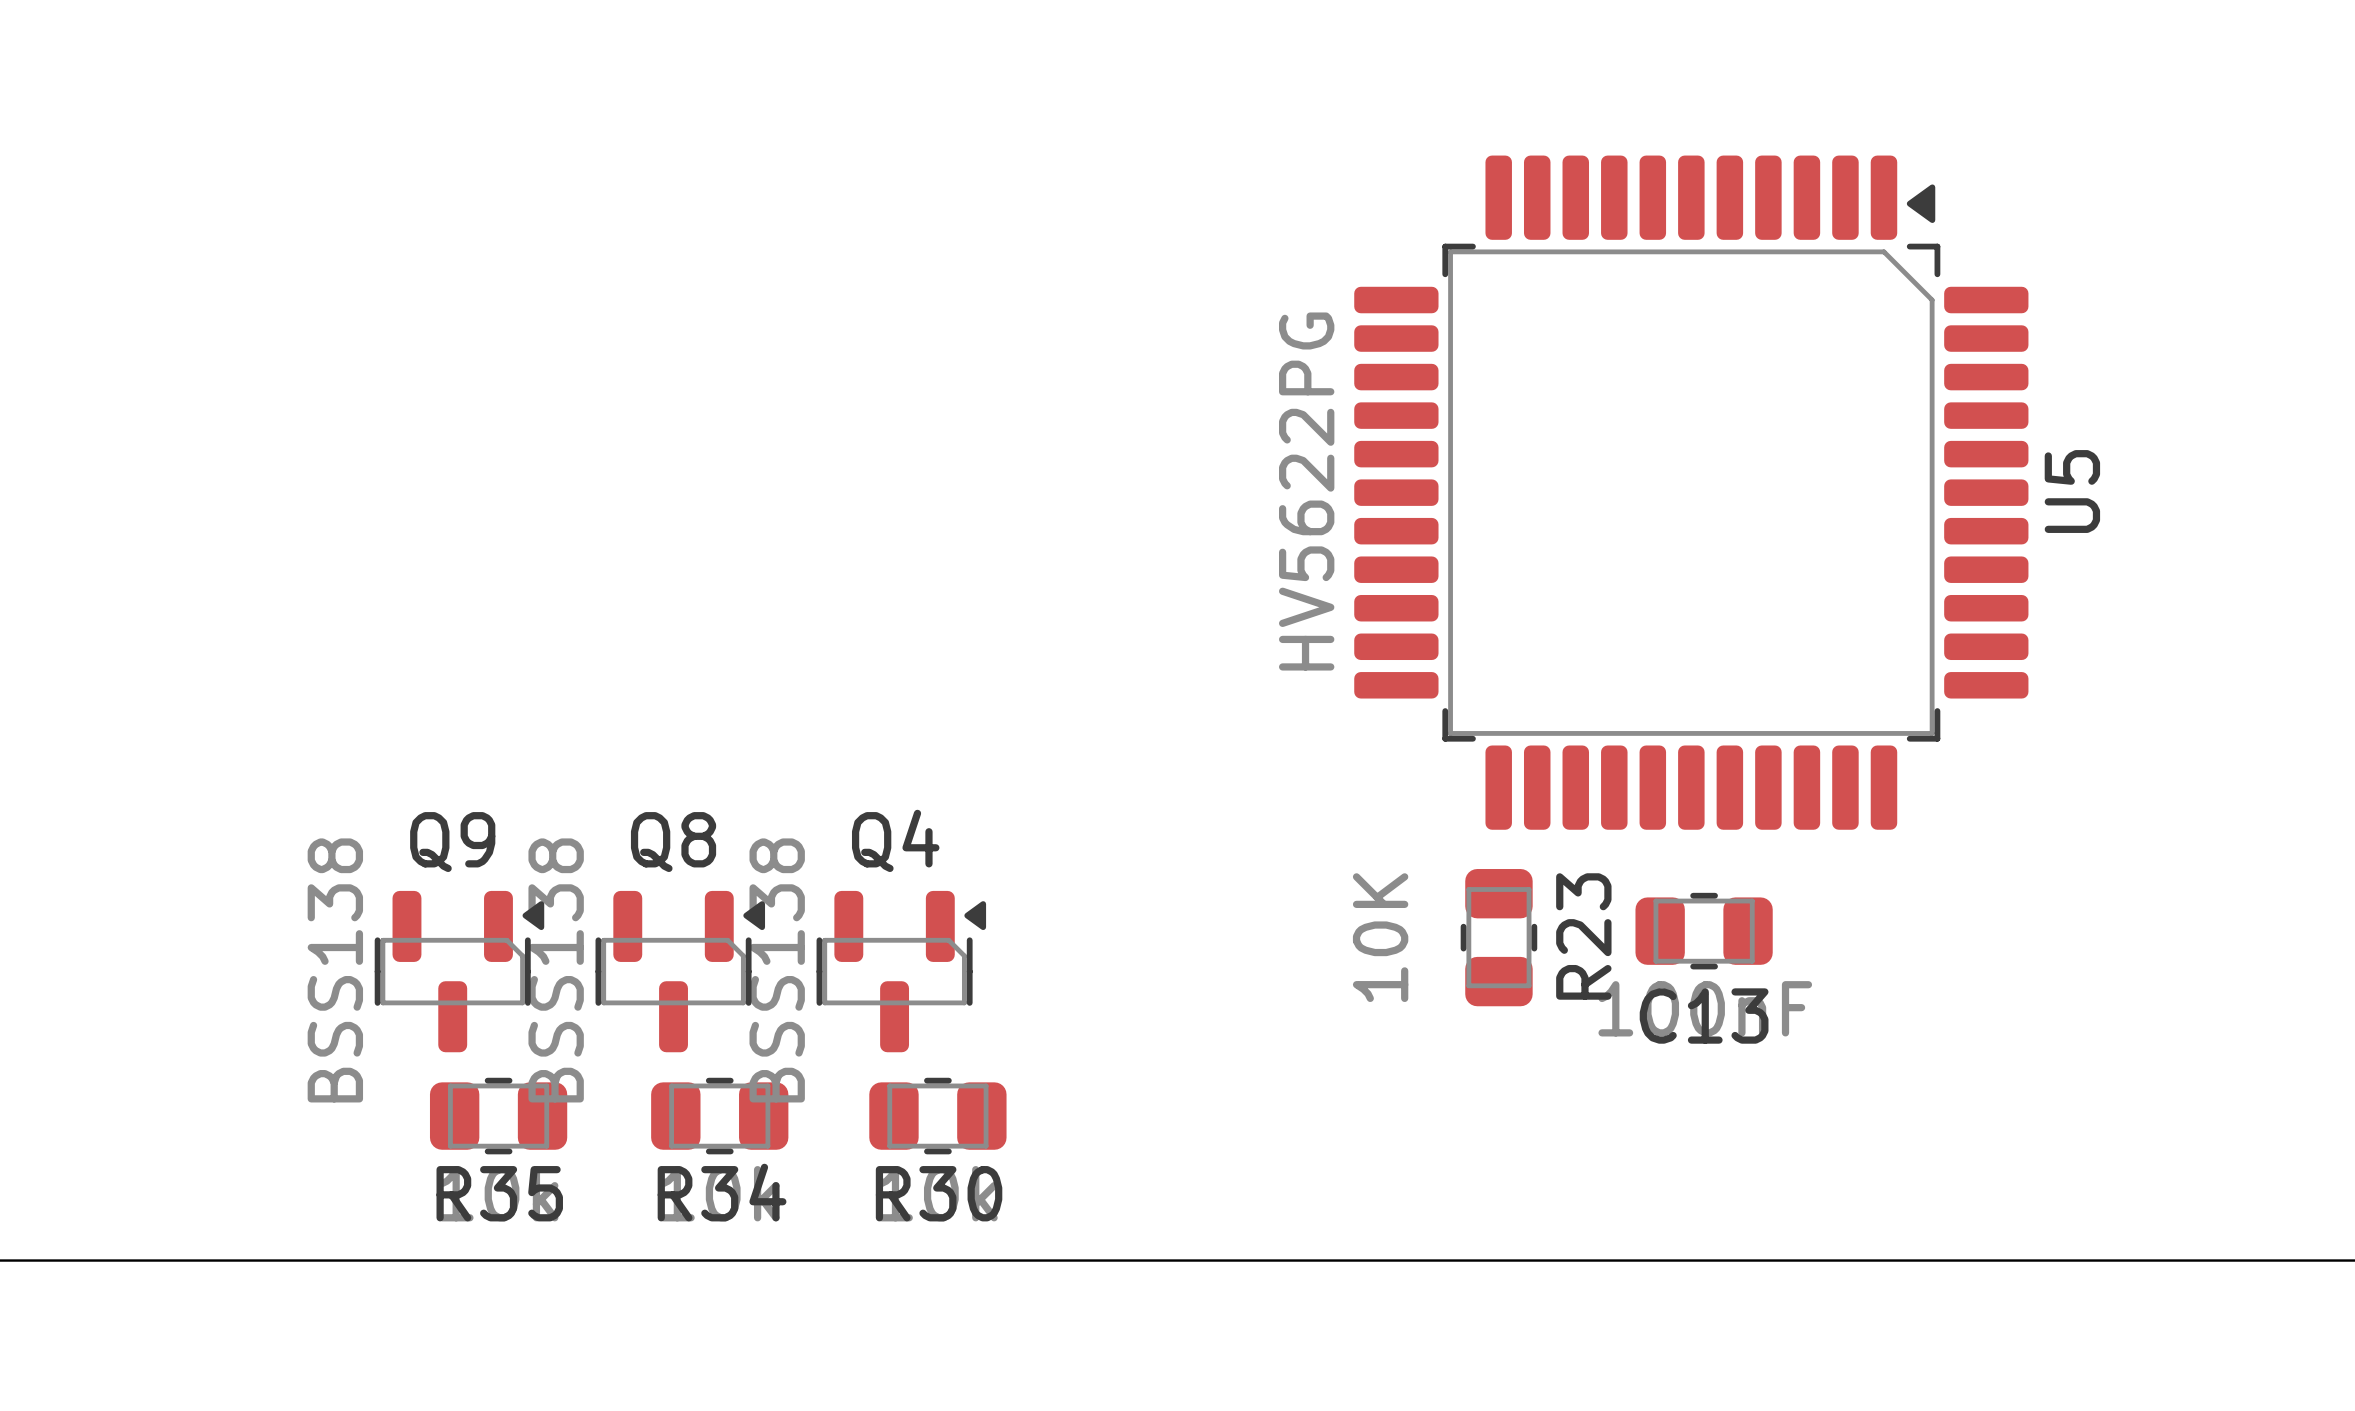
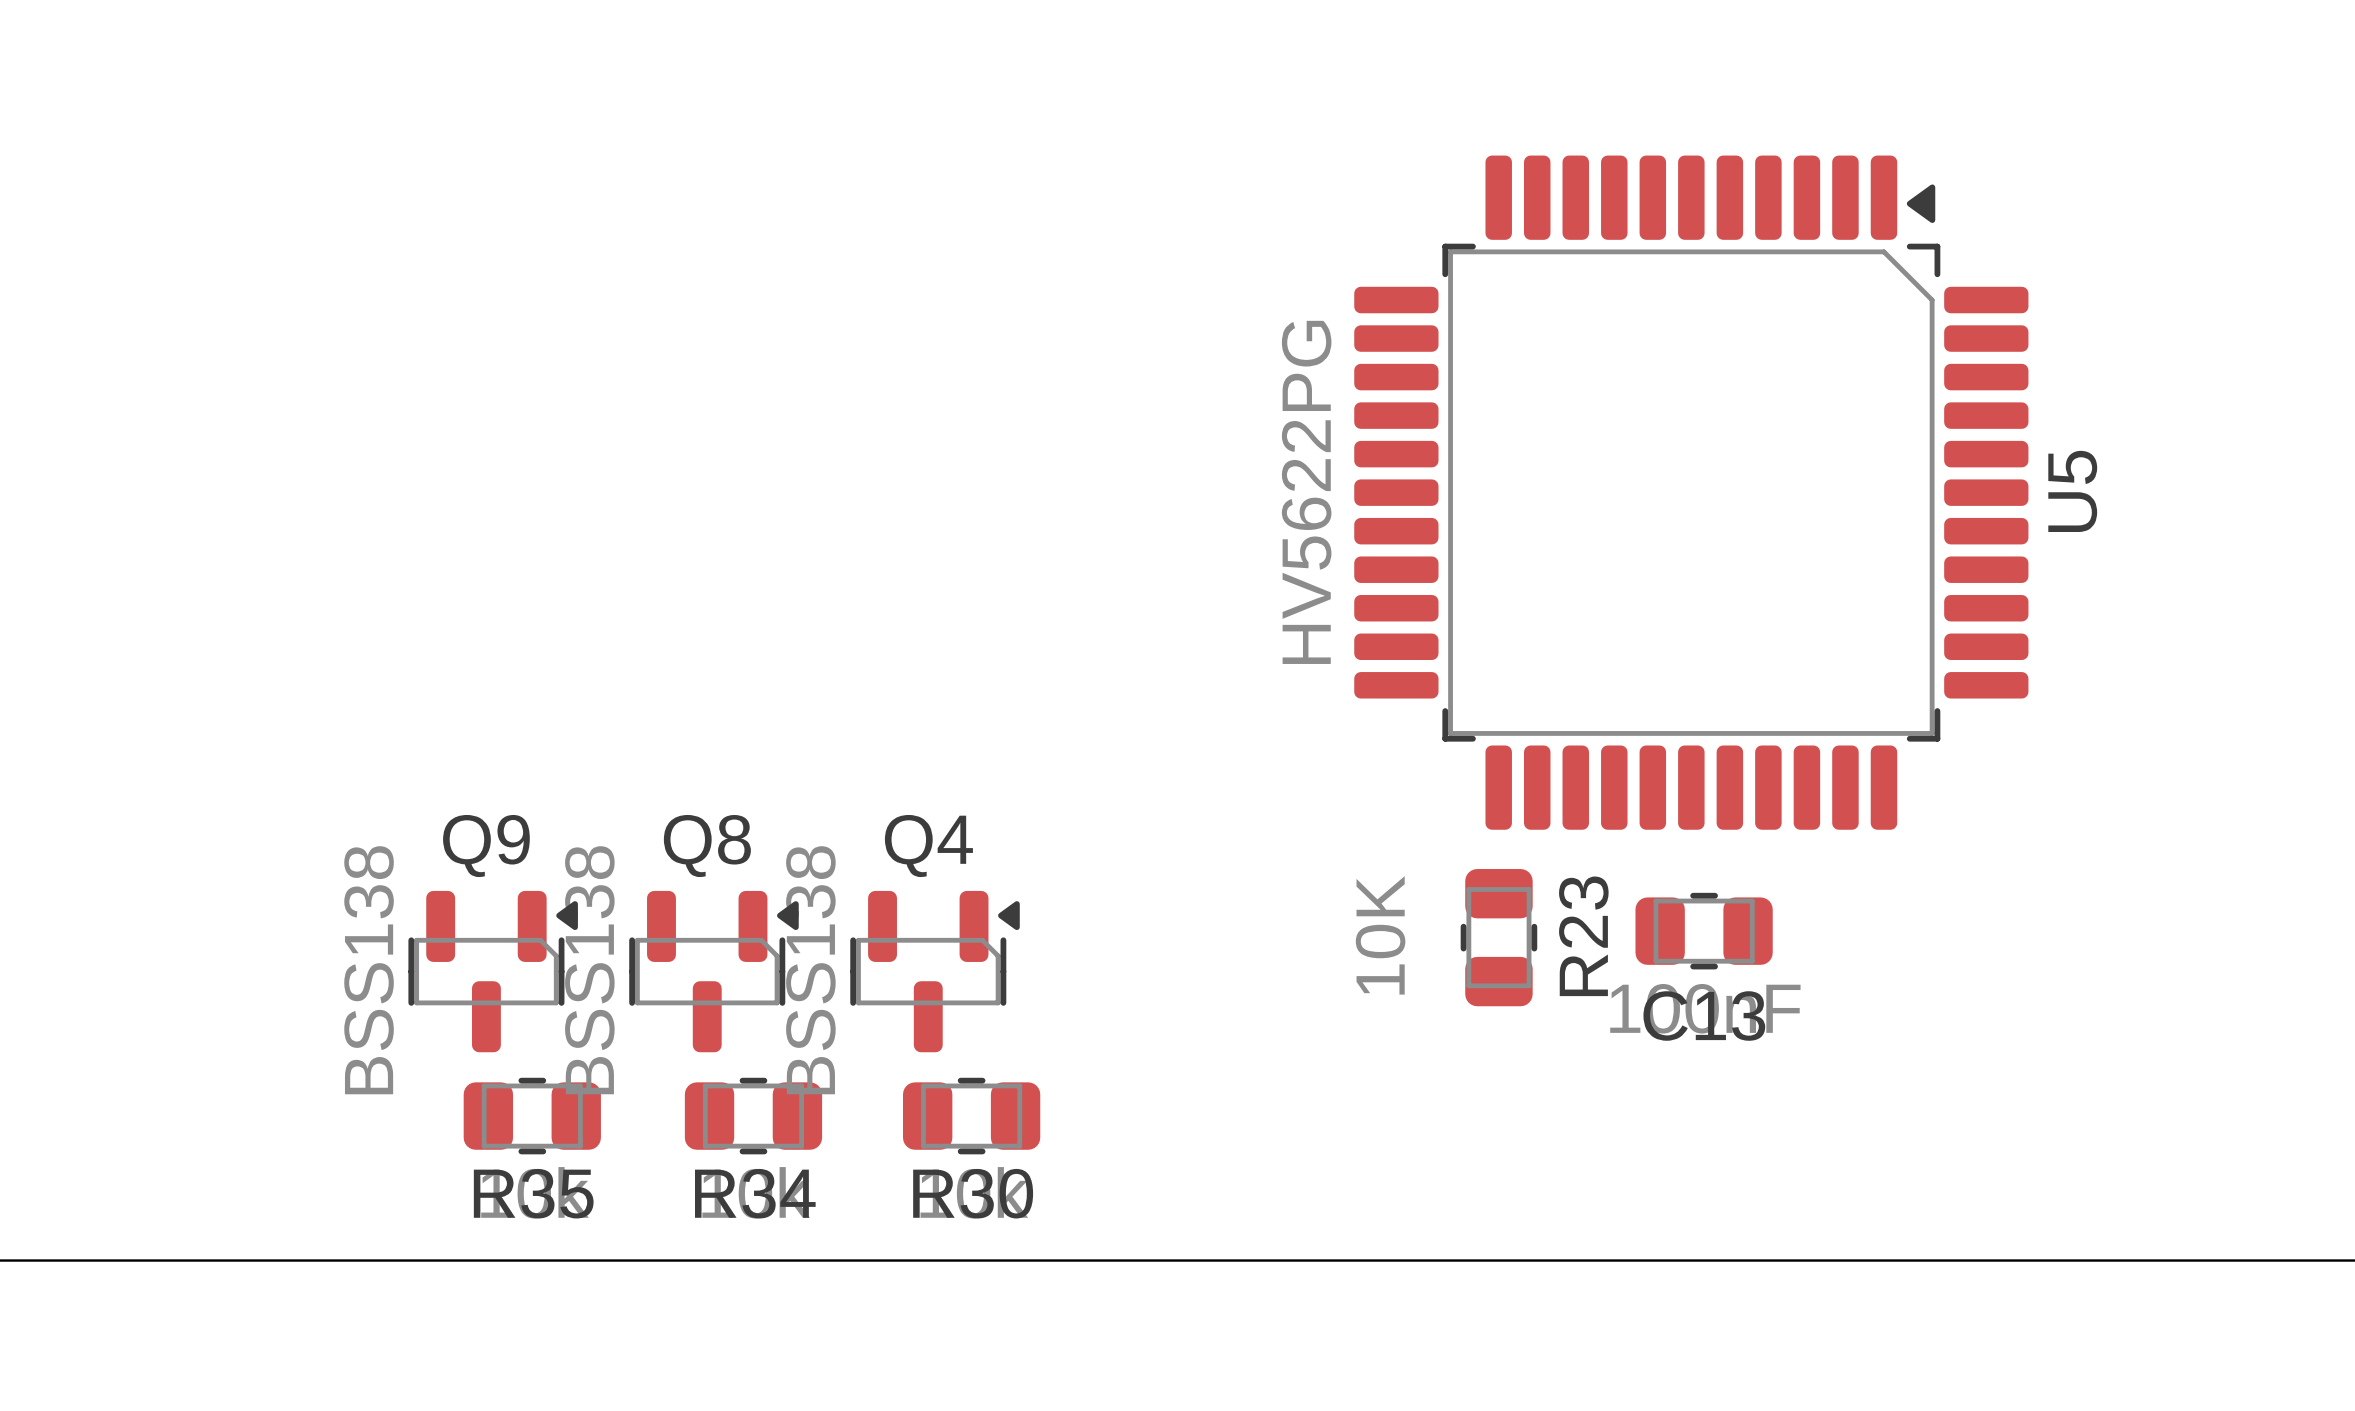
Q9 position: (459, 971) -> (493, 971)
Q8 position: (680, 971) -> (713, 971)
Q4 position: (901, 971) -> (935, 971)
R35 position: (498, 1116) -> (532, 1116)
R34 position: (719, 1116) -> (753, 1116)
R30 position: (937, 1116) -> (971, 1116)

